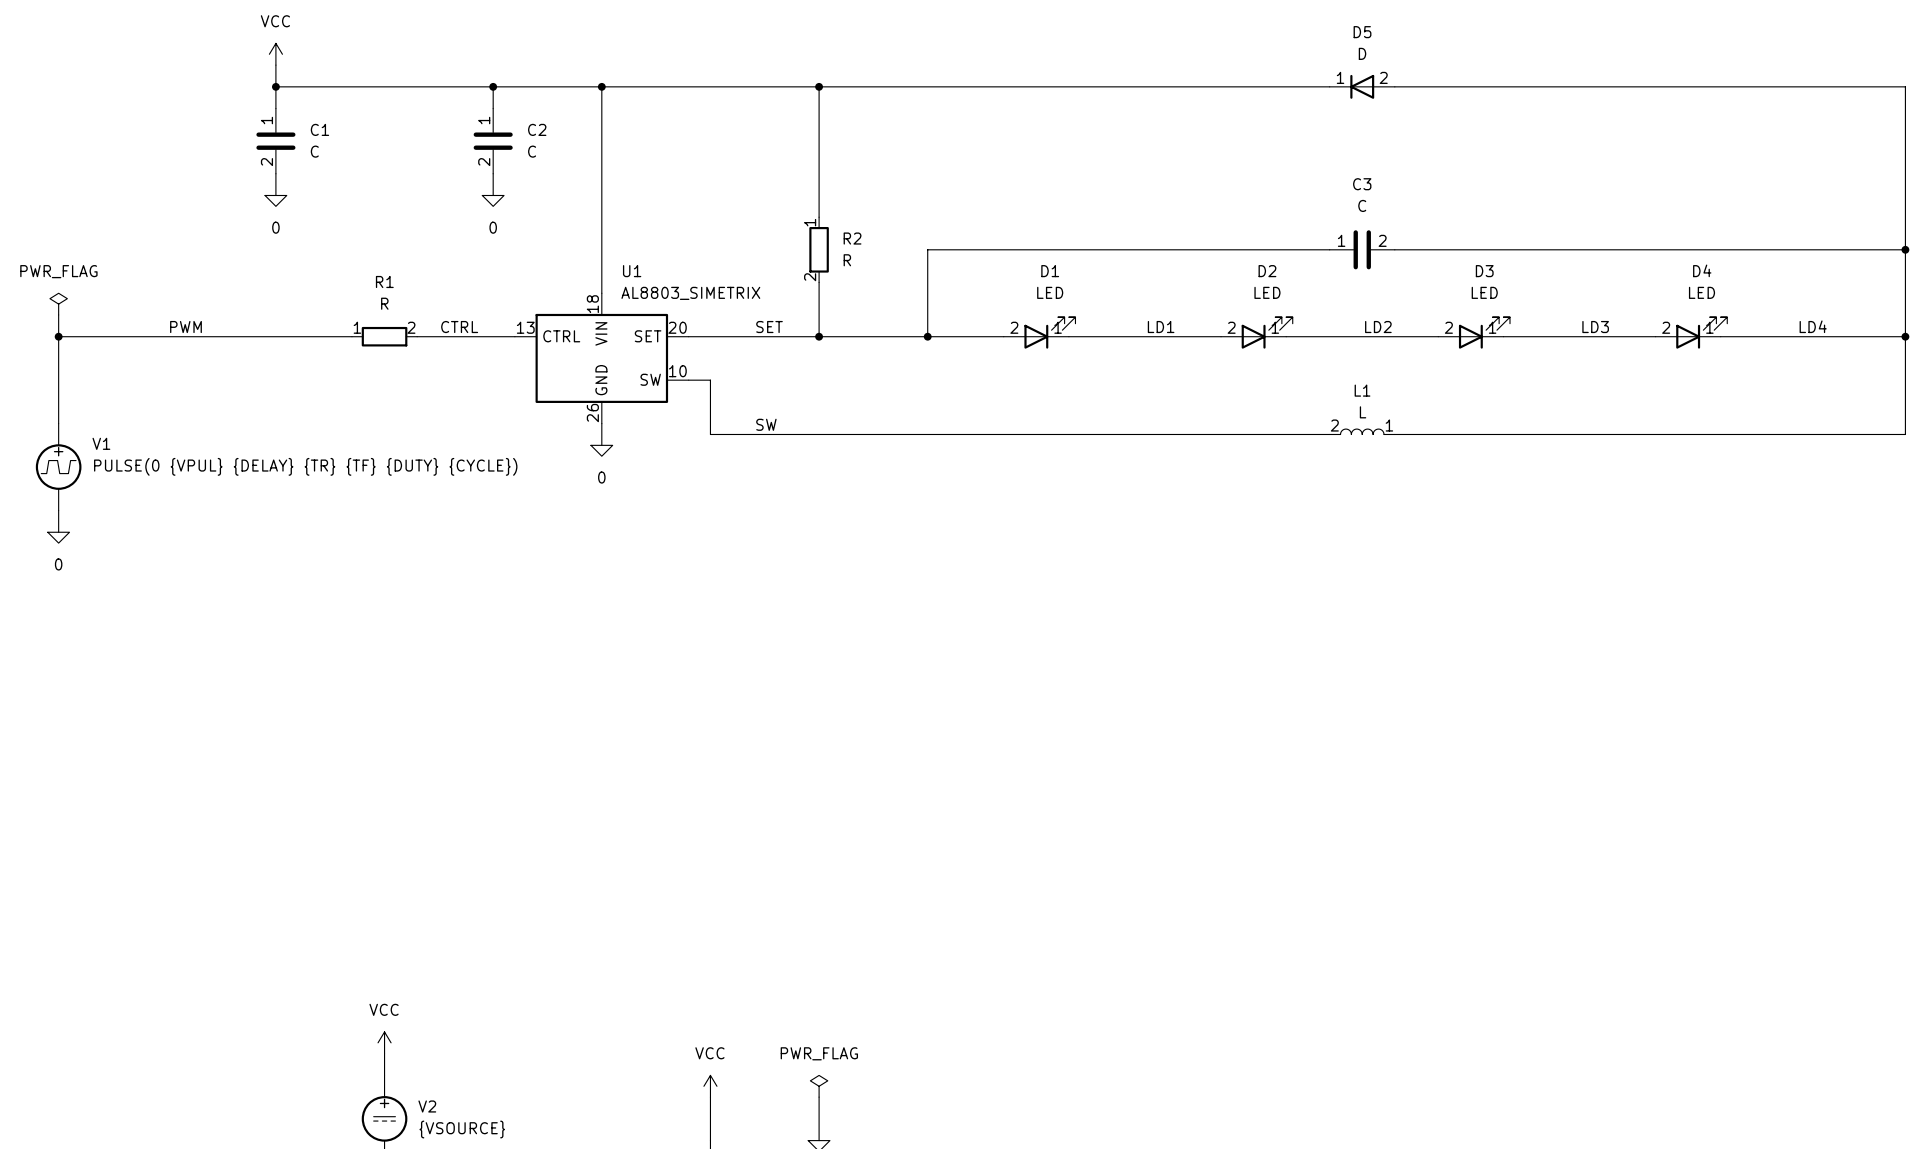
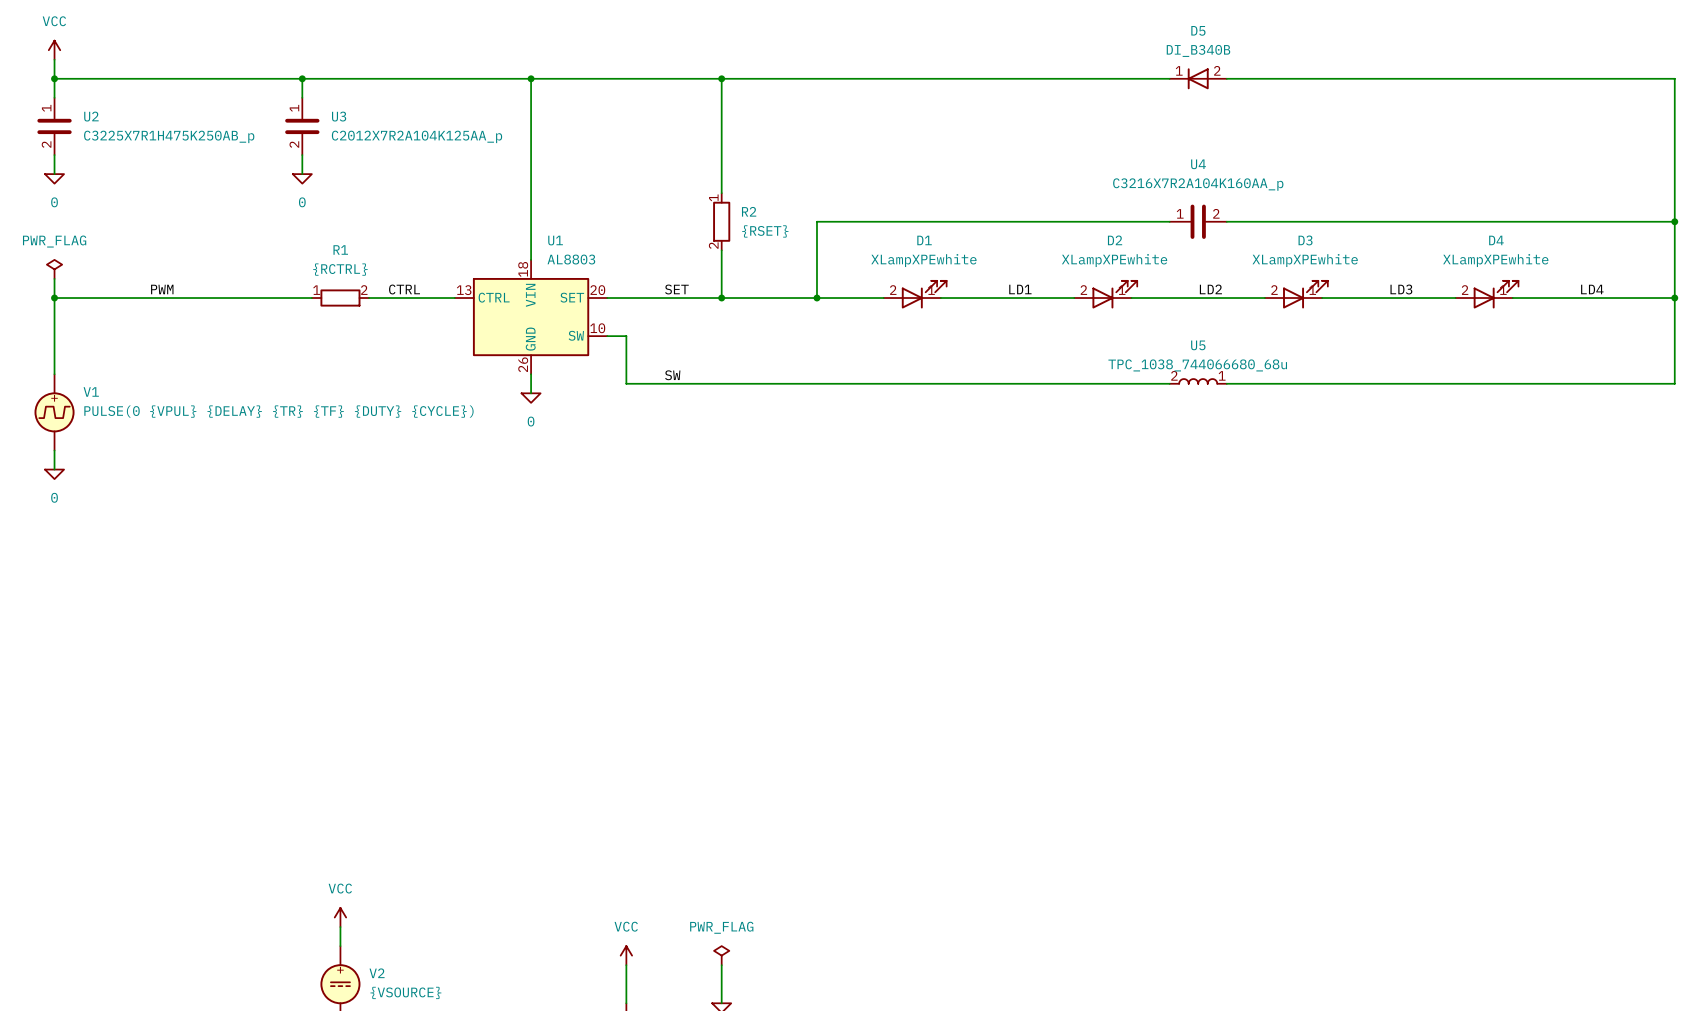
D5 value: D (1362, 53) -> DI_B340B (1198, 50)
power symbol: none -> VCC (54, 50)
power symbol: VCC (275, 54) -> none
wire: none -> (54, 59) (54, 97)
wire: (275, 65) (275, 108) -> none
wire: none -> (54, 78) (245, 78)
junction: none -> (54, 78)
junction: (275, 86) -> none
junction: none -> (302, 78)
wire: (493, 86) (493, 108) -> (302, 78) (302, 97)
junction: (493, 86) -> none
U2: none -> C3225X7R1H475K250AB_p (54, 126)
C1: C (275, 141) -> none
U3: none -> C2012X7R2A104K125AA_p (302, 126)
C2: C (493, 141) -> none
wire: none -> (54, 155) (54, 174)
wire: (275, 173) (275, 195) -> none
wire: (493, 173) (493, 195) -> (302, 155) (302, 174)
C3 name: C3 (1362, 184) -> U4 (1198, 164)
power symbol: none -> 0 (54, 178)
power symbol position: 0 (275, 200) -> 0 (302, 178)
power symbol: 0 (493, 200) -> none
C3 value: C (1362, 205) -> C3216X7R2A104K160AA_p (1198, 184)
R2 value: R (847, 260) -> {RSET} (765, 231)
D1 value: LED (1050, 292) -> XLampXPEwhite (923, 260)
D2 value: LED (1267, 292) -> XLampXPEwhite (1114, 260)
D3 value: LED (1484, 292) -> XLampXPEwhite (1305, 260)
D4 value: LED (1701, 292) -> XLampXPEwhite (1495, 260)
U1 value: AL8803_SIMETRIX (690, 293) -> AL8803 (571, 259)
R1 value: R (384, 303) -> {RCTRL} (340, 269)
L1 name: L1 (1362, 390) -> U5 (1198, 345)
L1 value: L (1363, 412) -> TPC_1038_744066680_68u (1197, 365)

